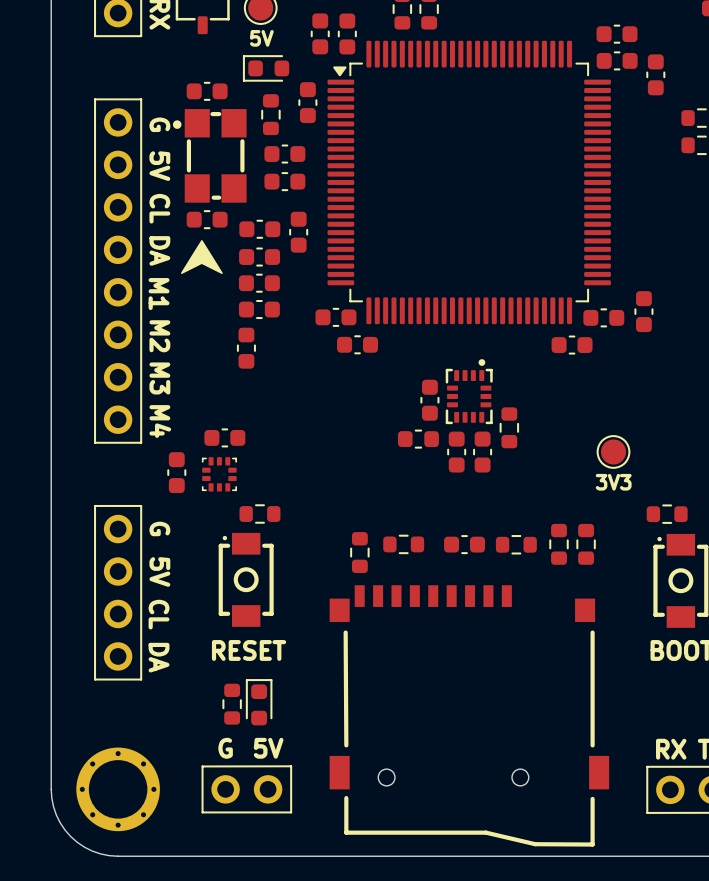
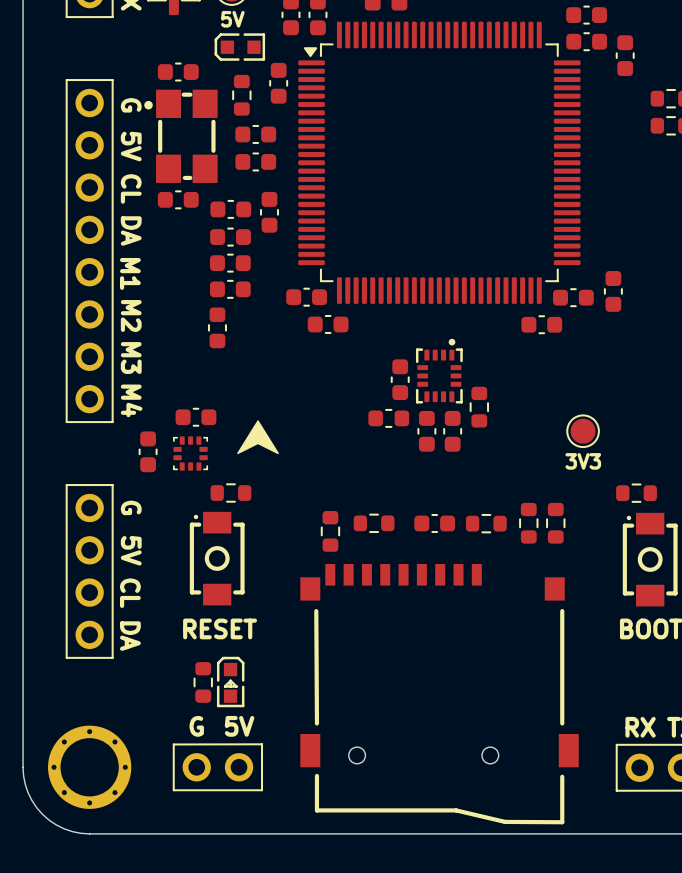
part footprint: [242, 55, 290, 82] -> [214, 33, 266, 61]
drawing position: (201, 257) -> (258, 437)
part footprint: [245, 679, 273, 726] -> [216, 656, 245, 708]

